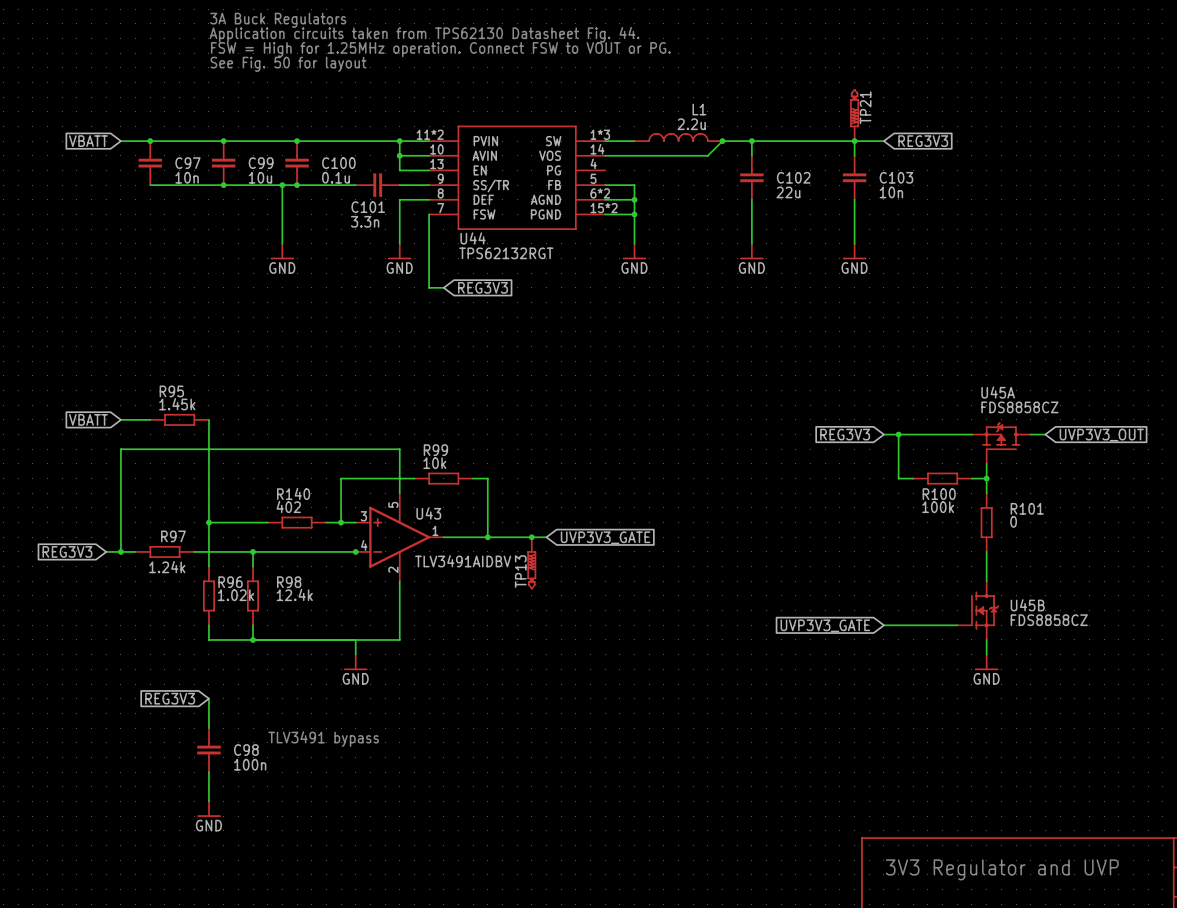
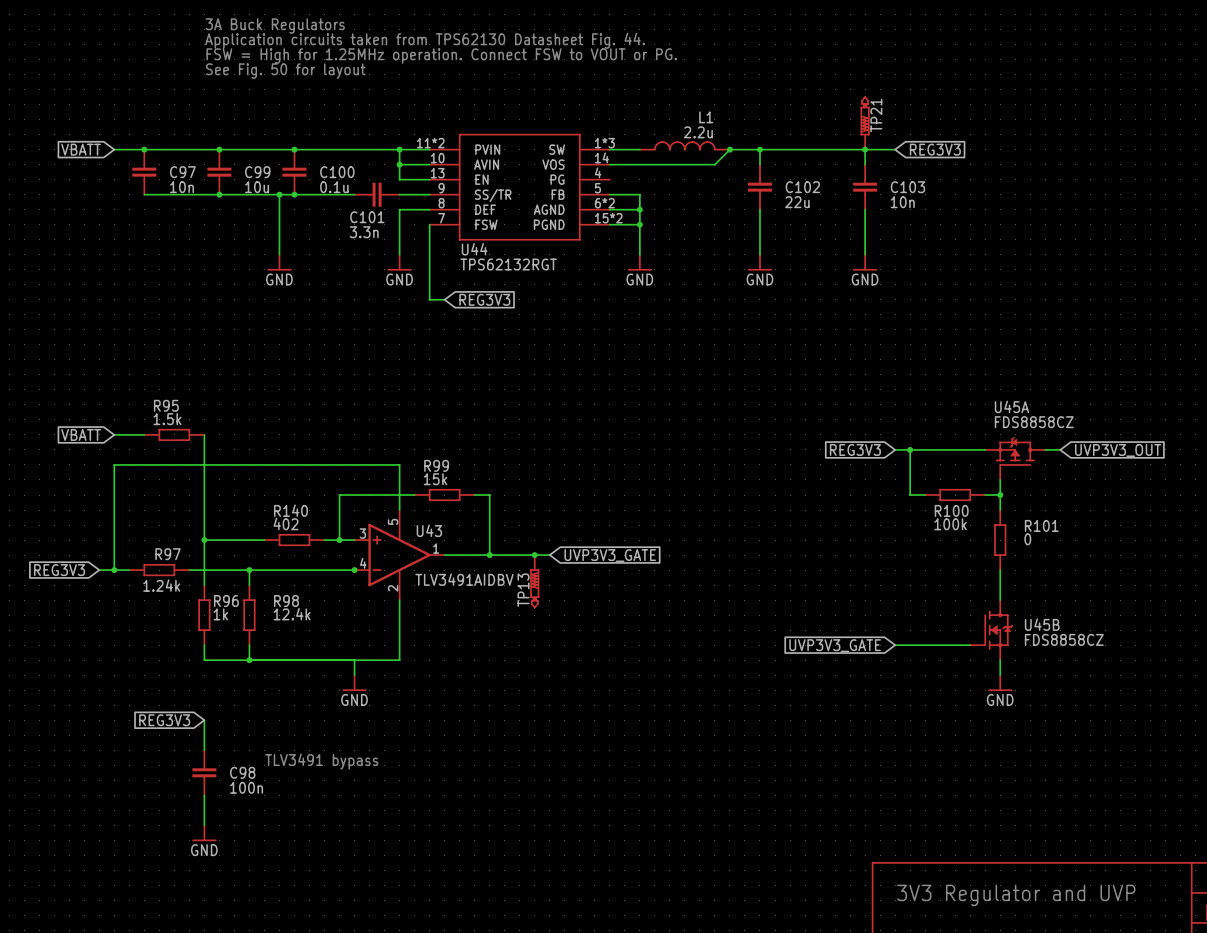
R95 value: 1.45k (177, 404) -> 1.5k (167, 419)
R99 value: 10k (434, 463) -> 15k (435, 479)
R96 value: 1.02k (236, 595) -> 1k (220, 614)

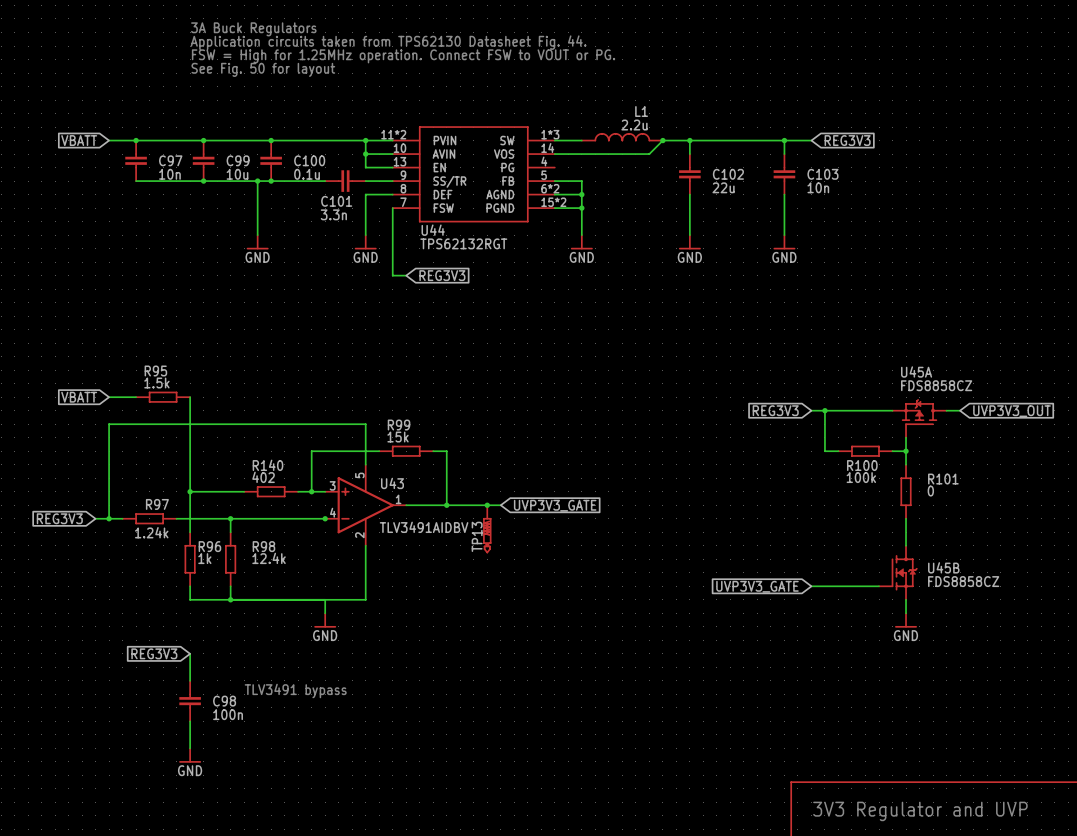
TP21: (865, 123) -> none

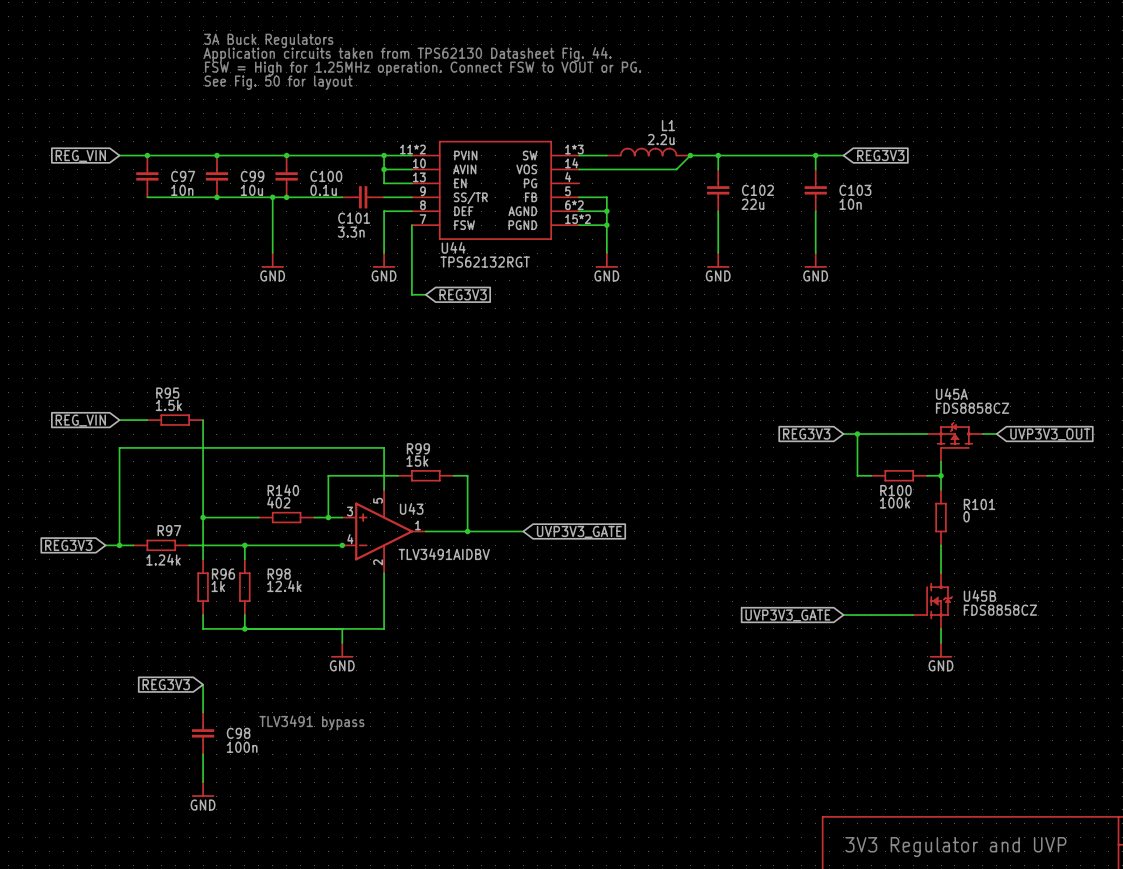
global label: VBATT (79, 140) -> REG_VIN (80, 156)
global label: VBATT (79, 397) -> REG_VIN (80, 420)
junction: (487, 505) -> none
TP13: (487, 529) -> none

